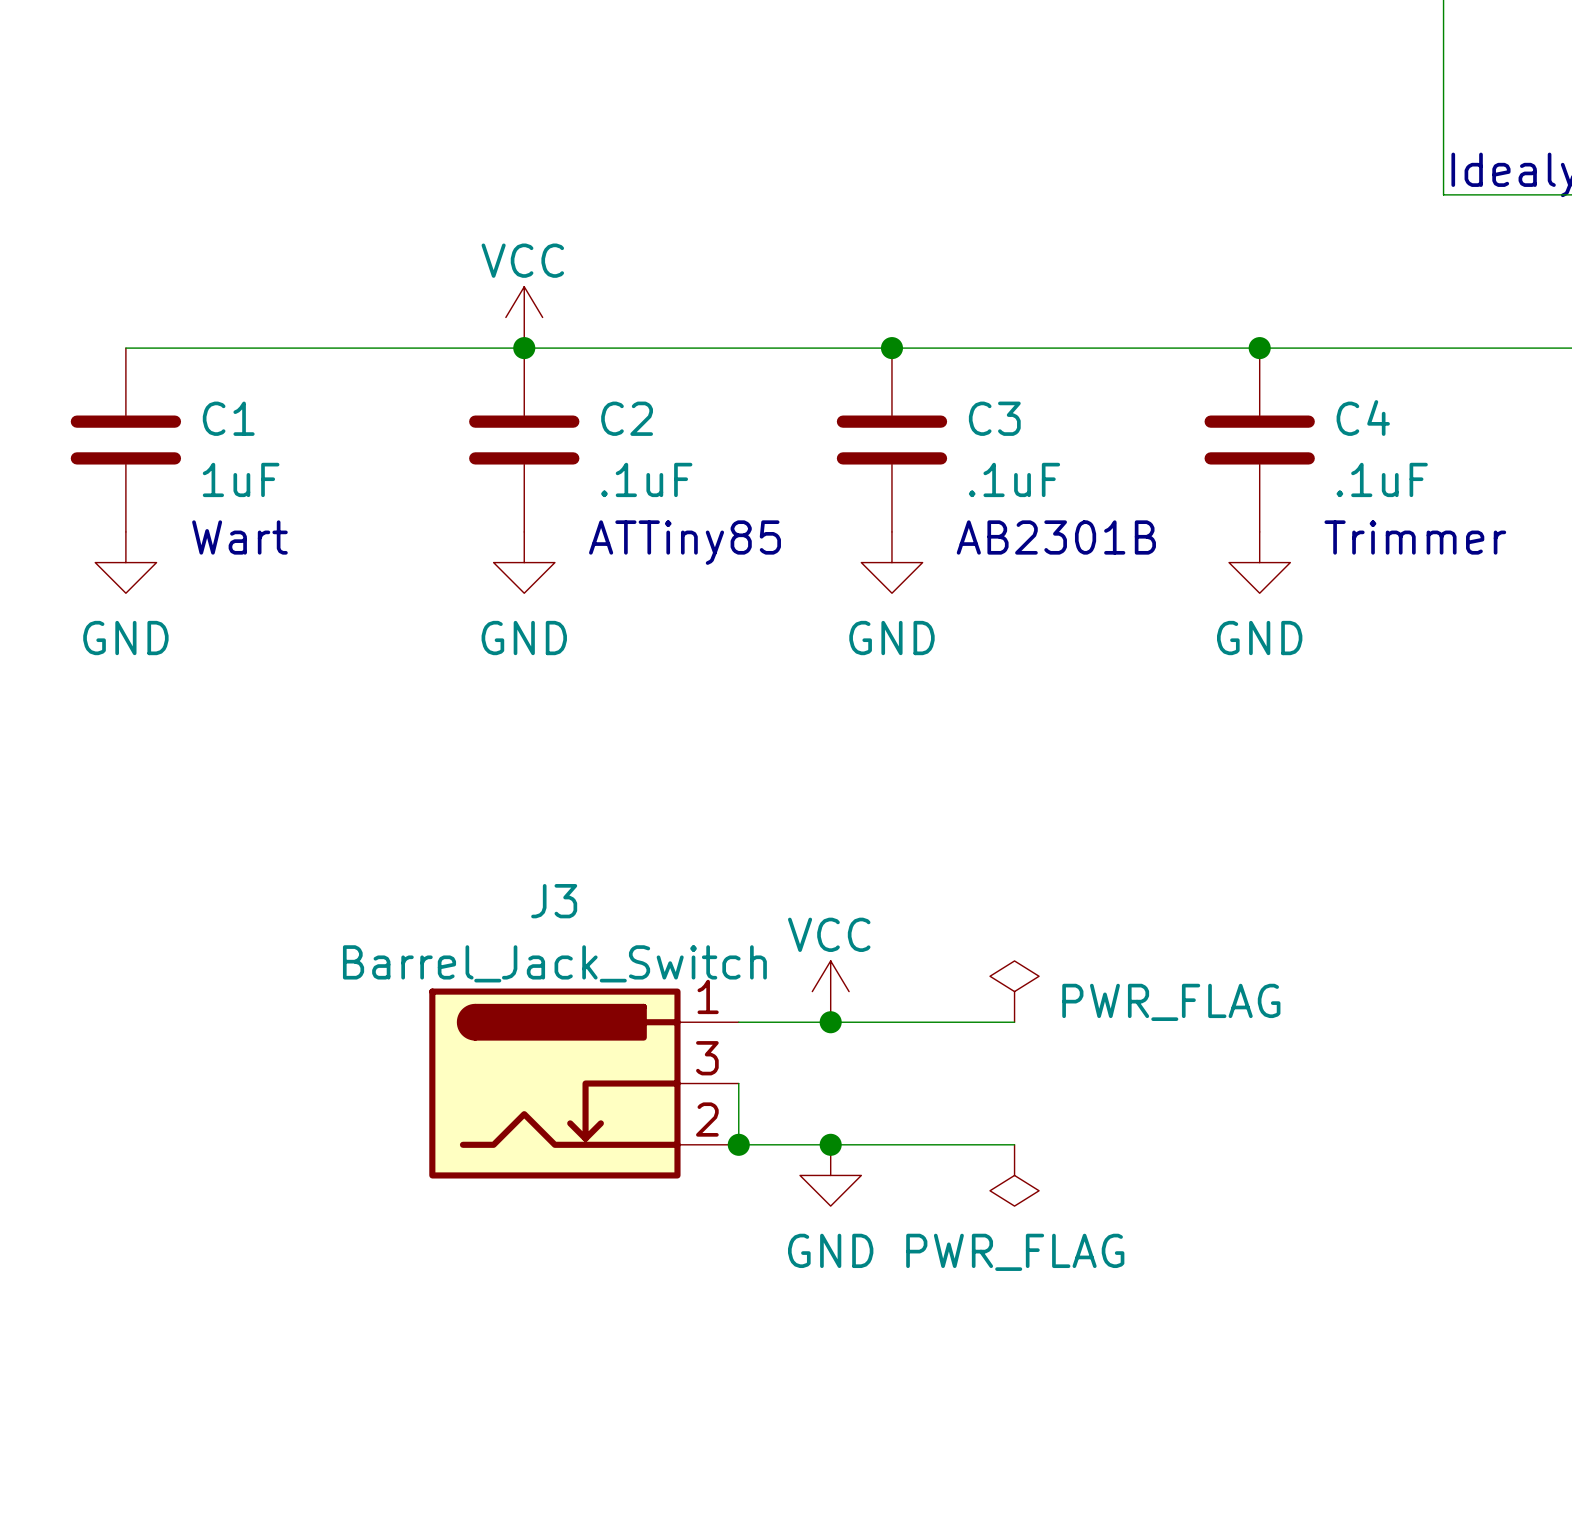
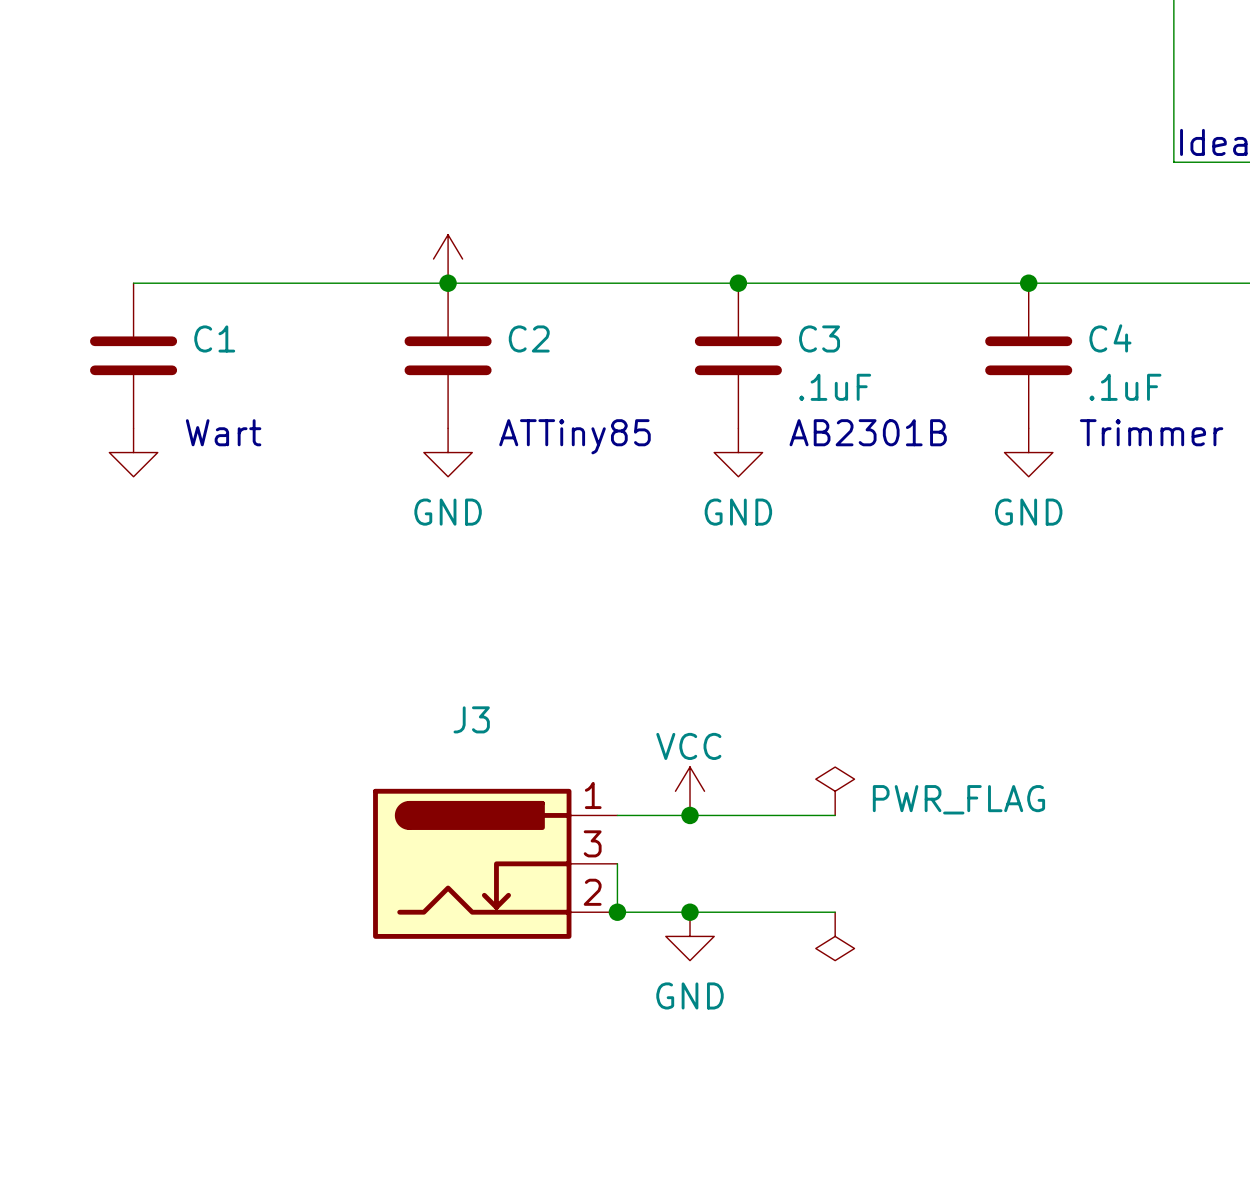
power symbol text: VCC (522, 260) -> none
C1 value: 1uF (241, 479) -> none
C2 value: .1uF (646, 479) -> none
power symbol text: GND (125, 638) -> none
J3 value: Barrel_Jack_Switch (554, 963) -> none
power symbol text: PWR_FLAG (1015, 1252) -> none

